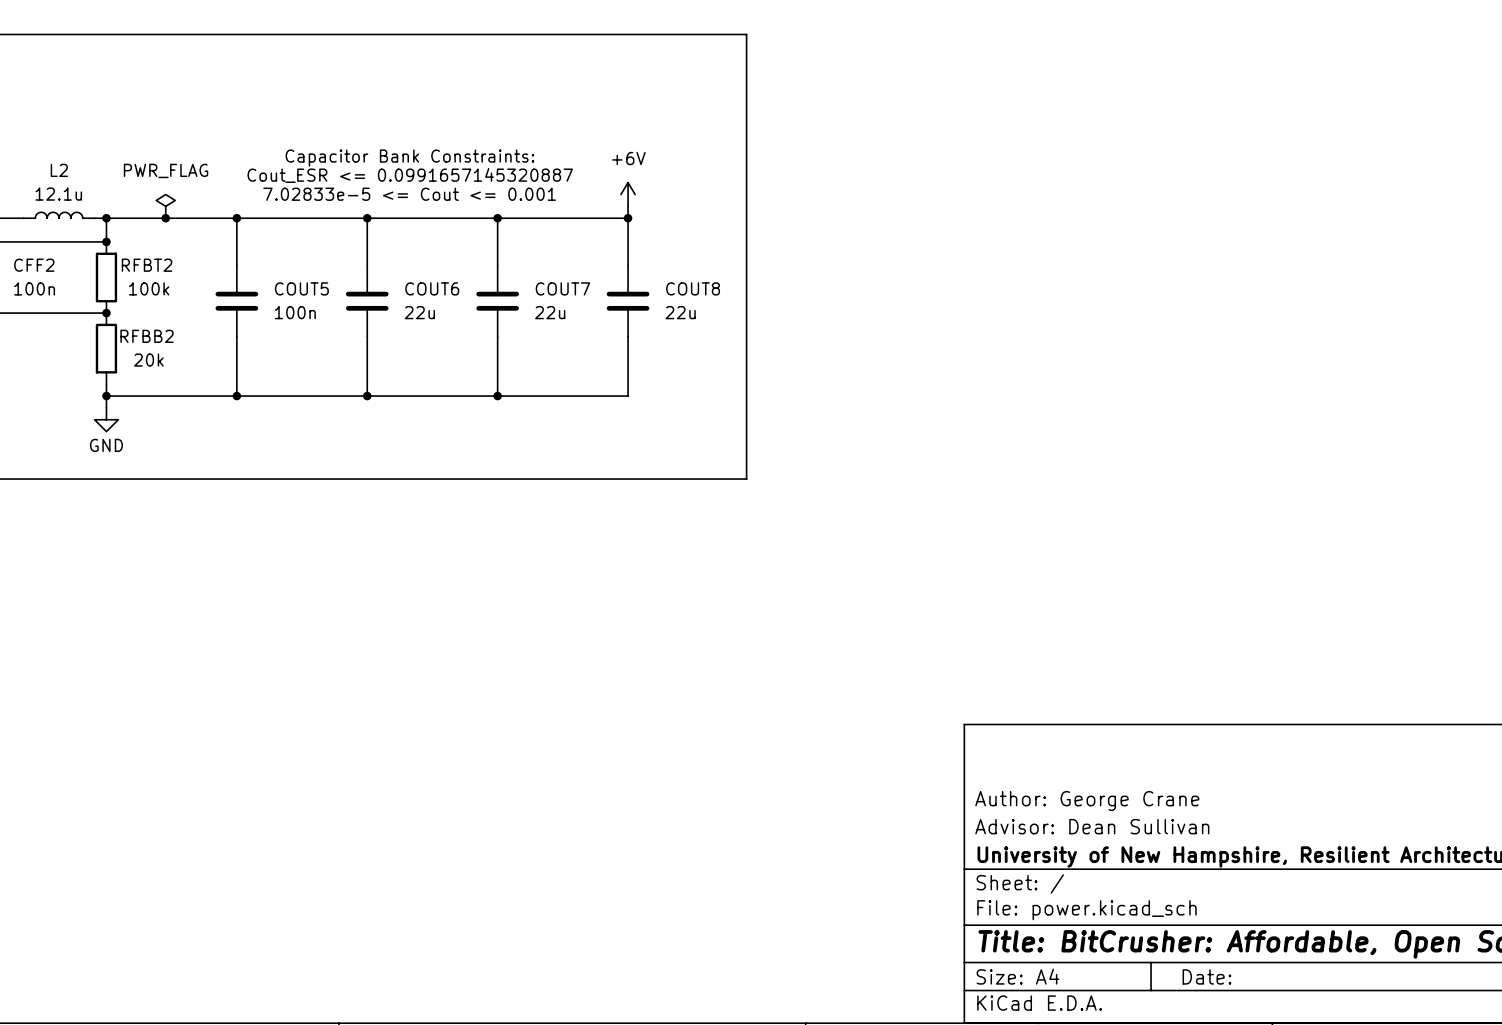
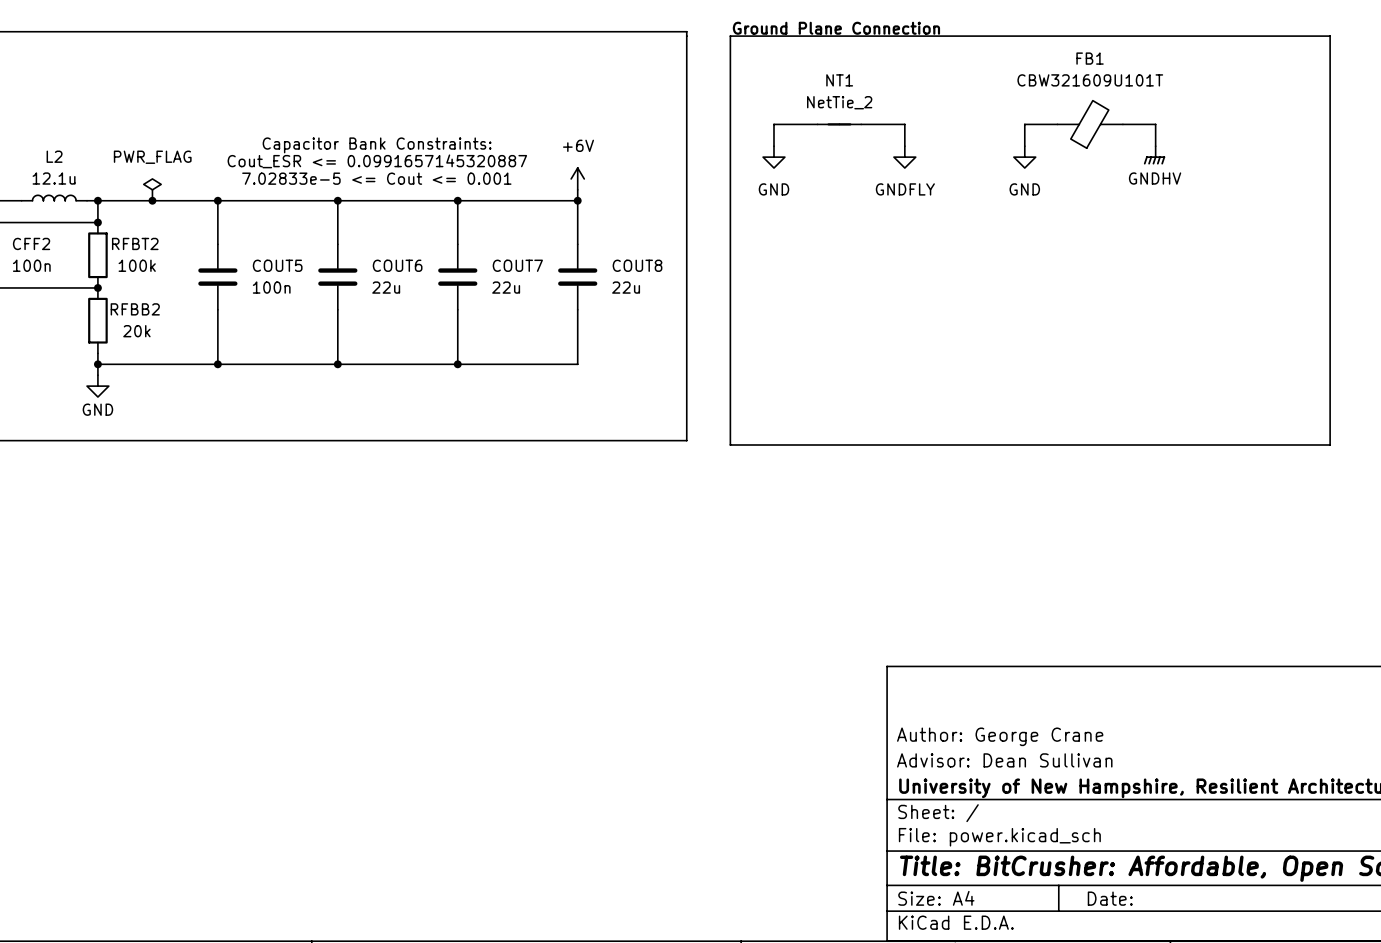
text: none -> Ground Plane Connection (836, 28)
line: none -> (730, 36) (1330, 36) (1330, 445) (730, 445) (730, 36)
wire: none -> (817, 124) (773, 124) (773, 146)
NT1: none -> NetTie_2 (839, 124)
wire: none -> (861, 124) (904, 124) (904, 146)
wire: none -> (1057, 124) (1024, 124) (1024, 146)
FB1: none -> CBW321609U101T (1090, 124)
wire: none -> (1122, 124) (1155, 124) (1155, 146)
power symbol: none -> GNDHV (1154, 155)
power symbol: none -> GND (773, 157)
power symbol: none -> GNDFLY (904, 157)
power symbol: none -> GND (1024, 157)

